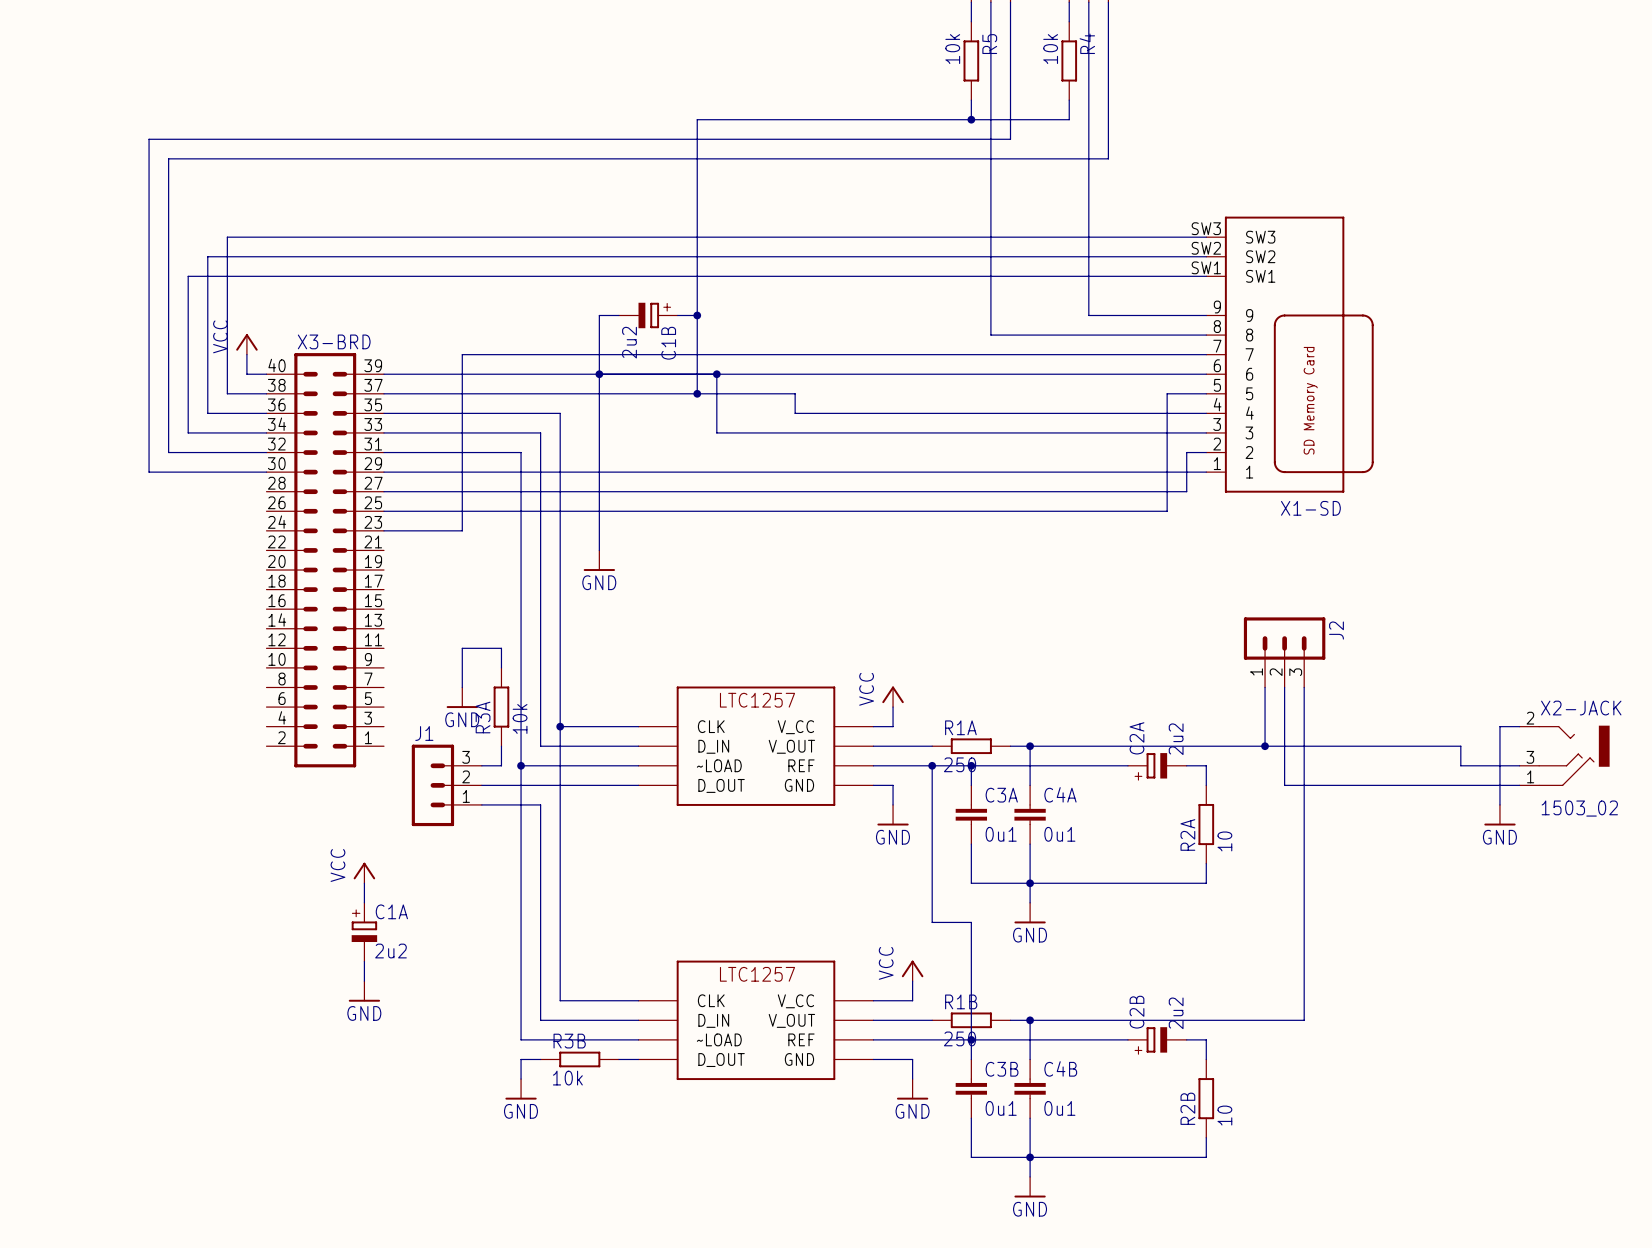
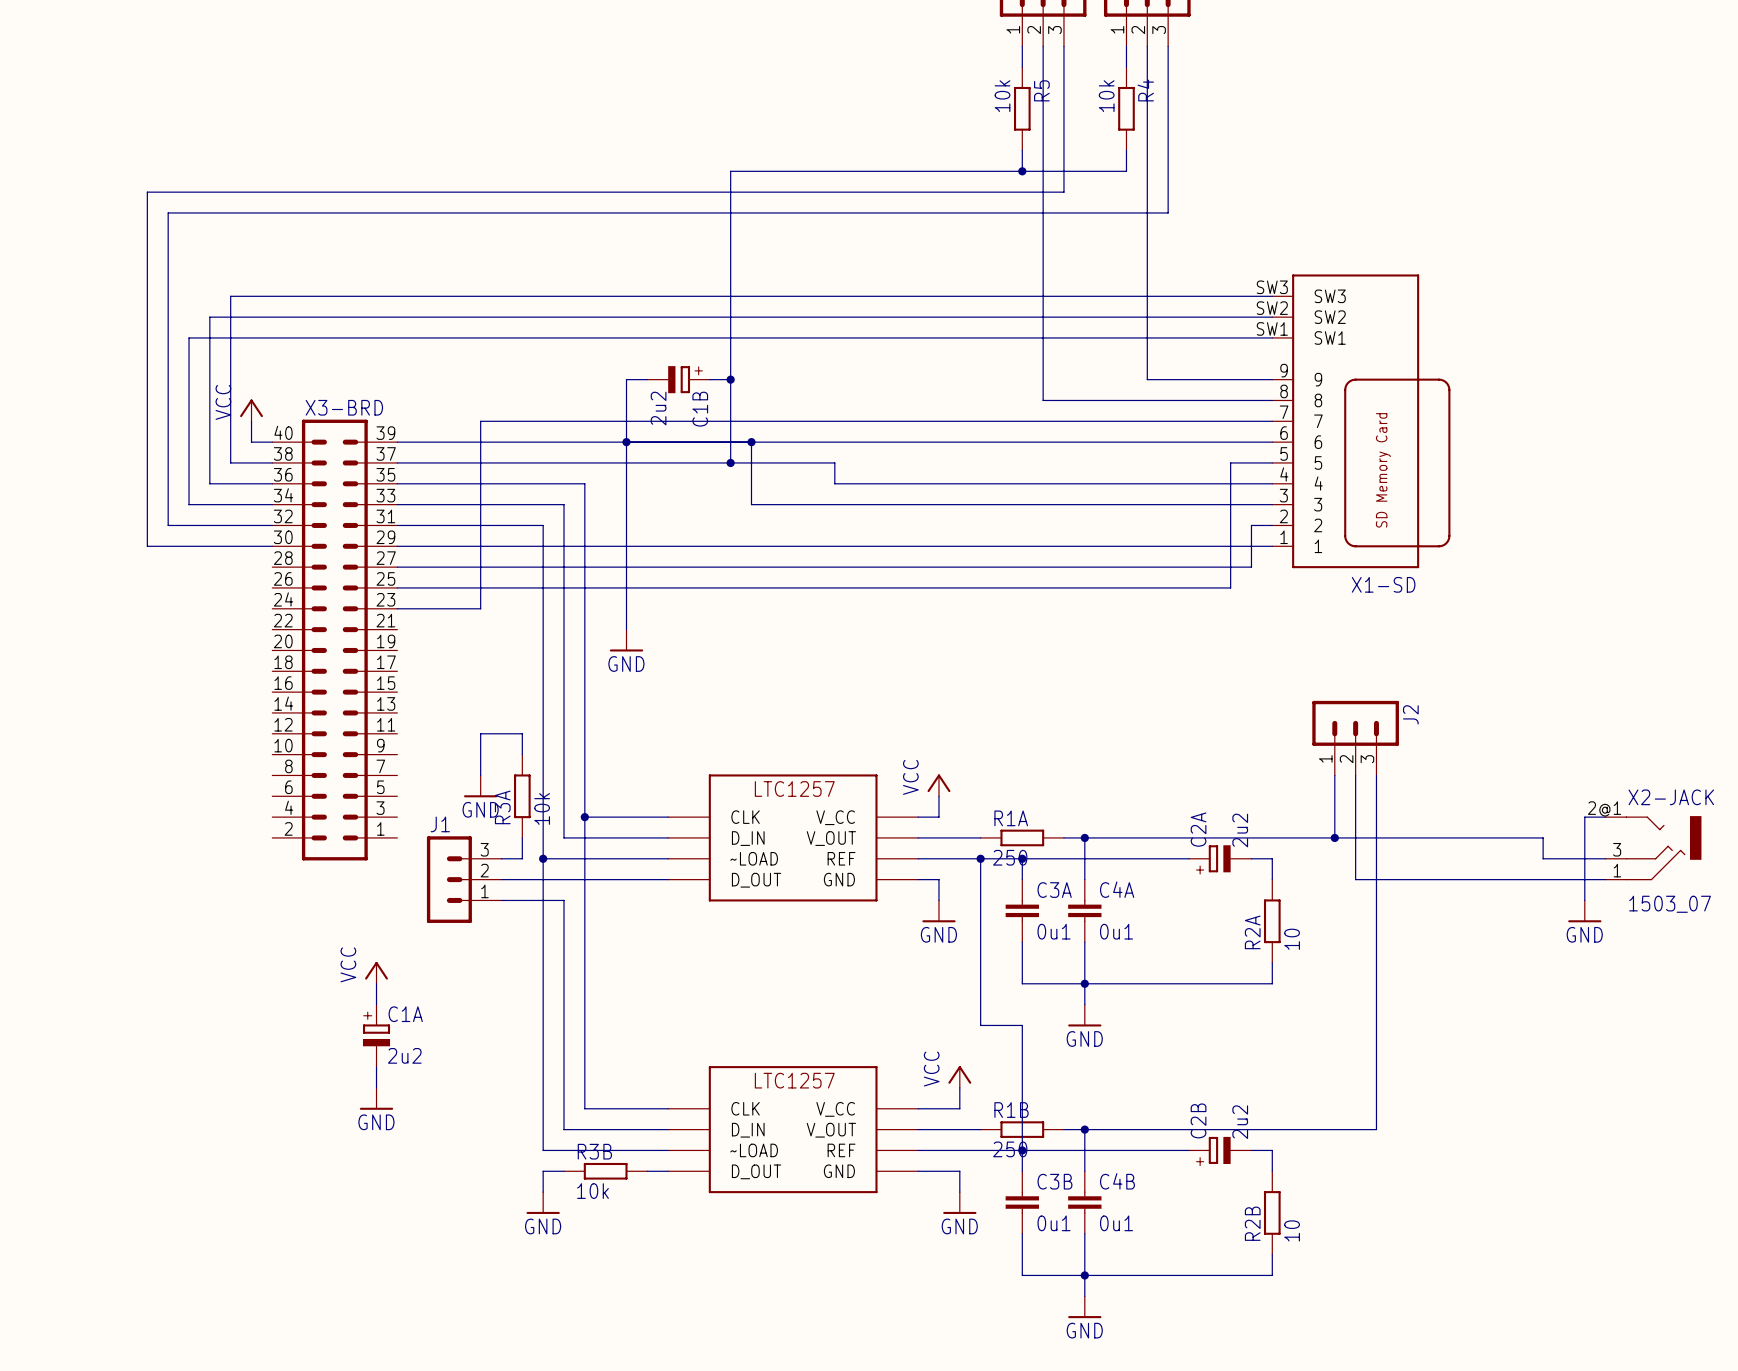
X2-JACK pin number: 2 (1530, 718) -> 2@1 (1604, 808)
X2-JACK value: 1503_02 (1579, 808) -> 1503_07 (1670, 904)

